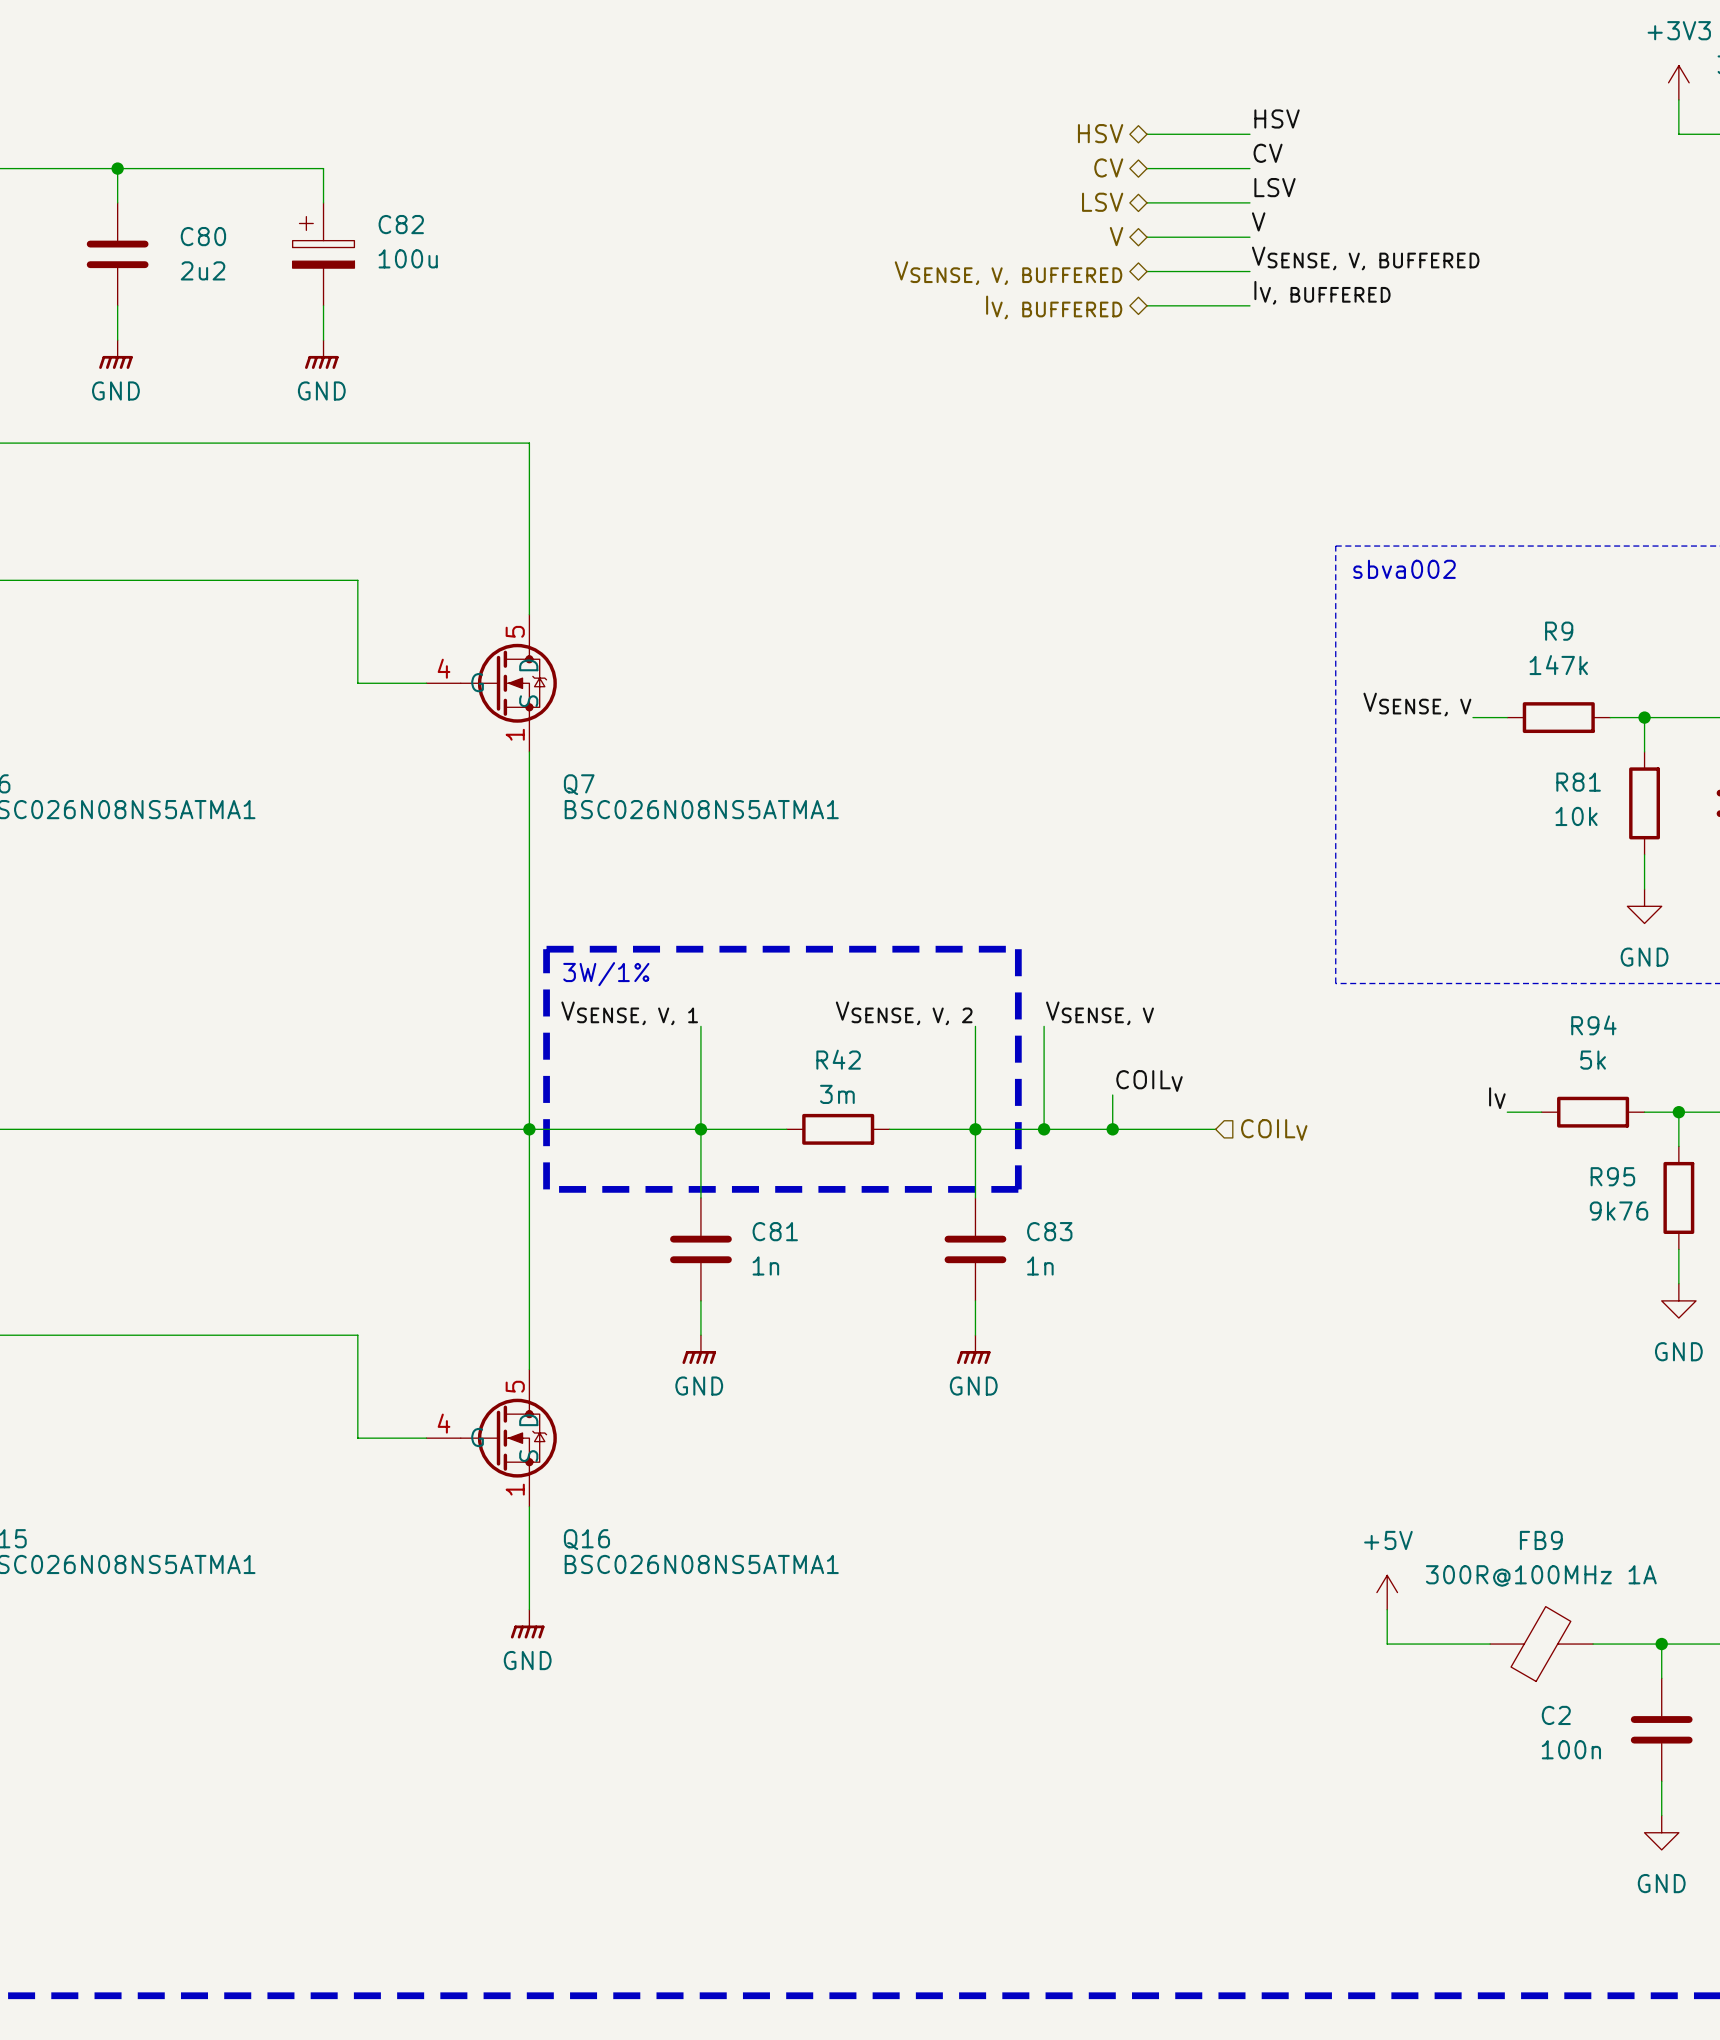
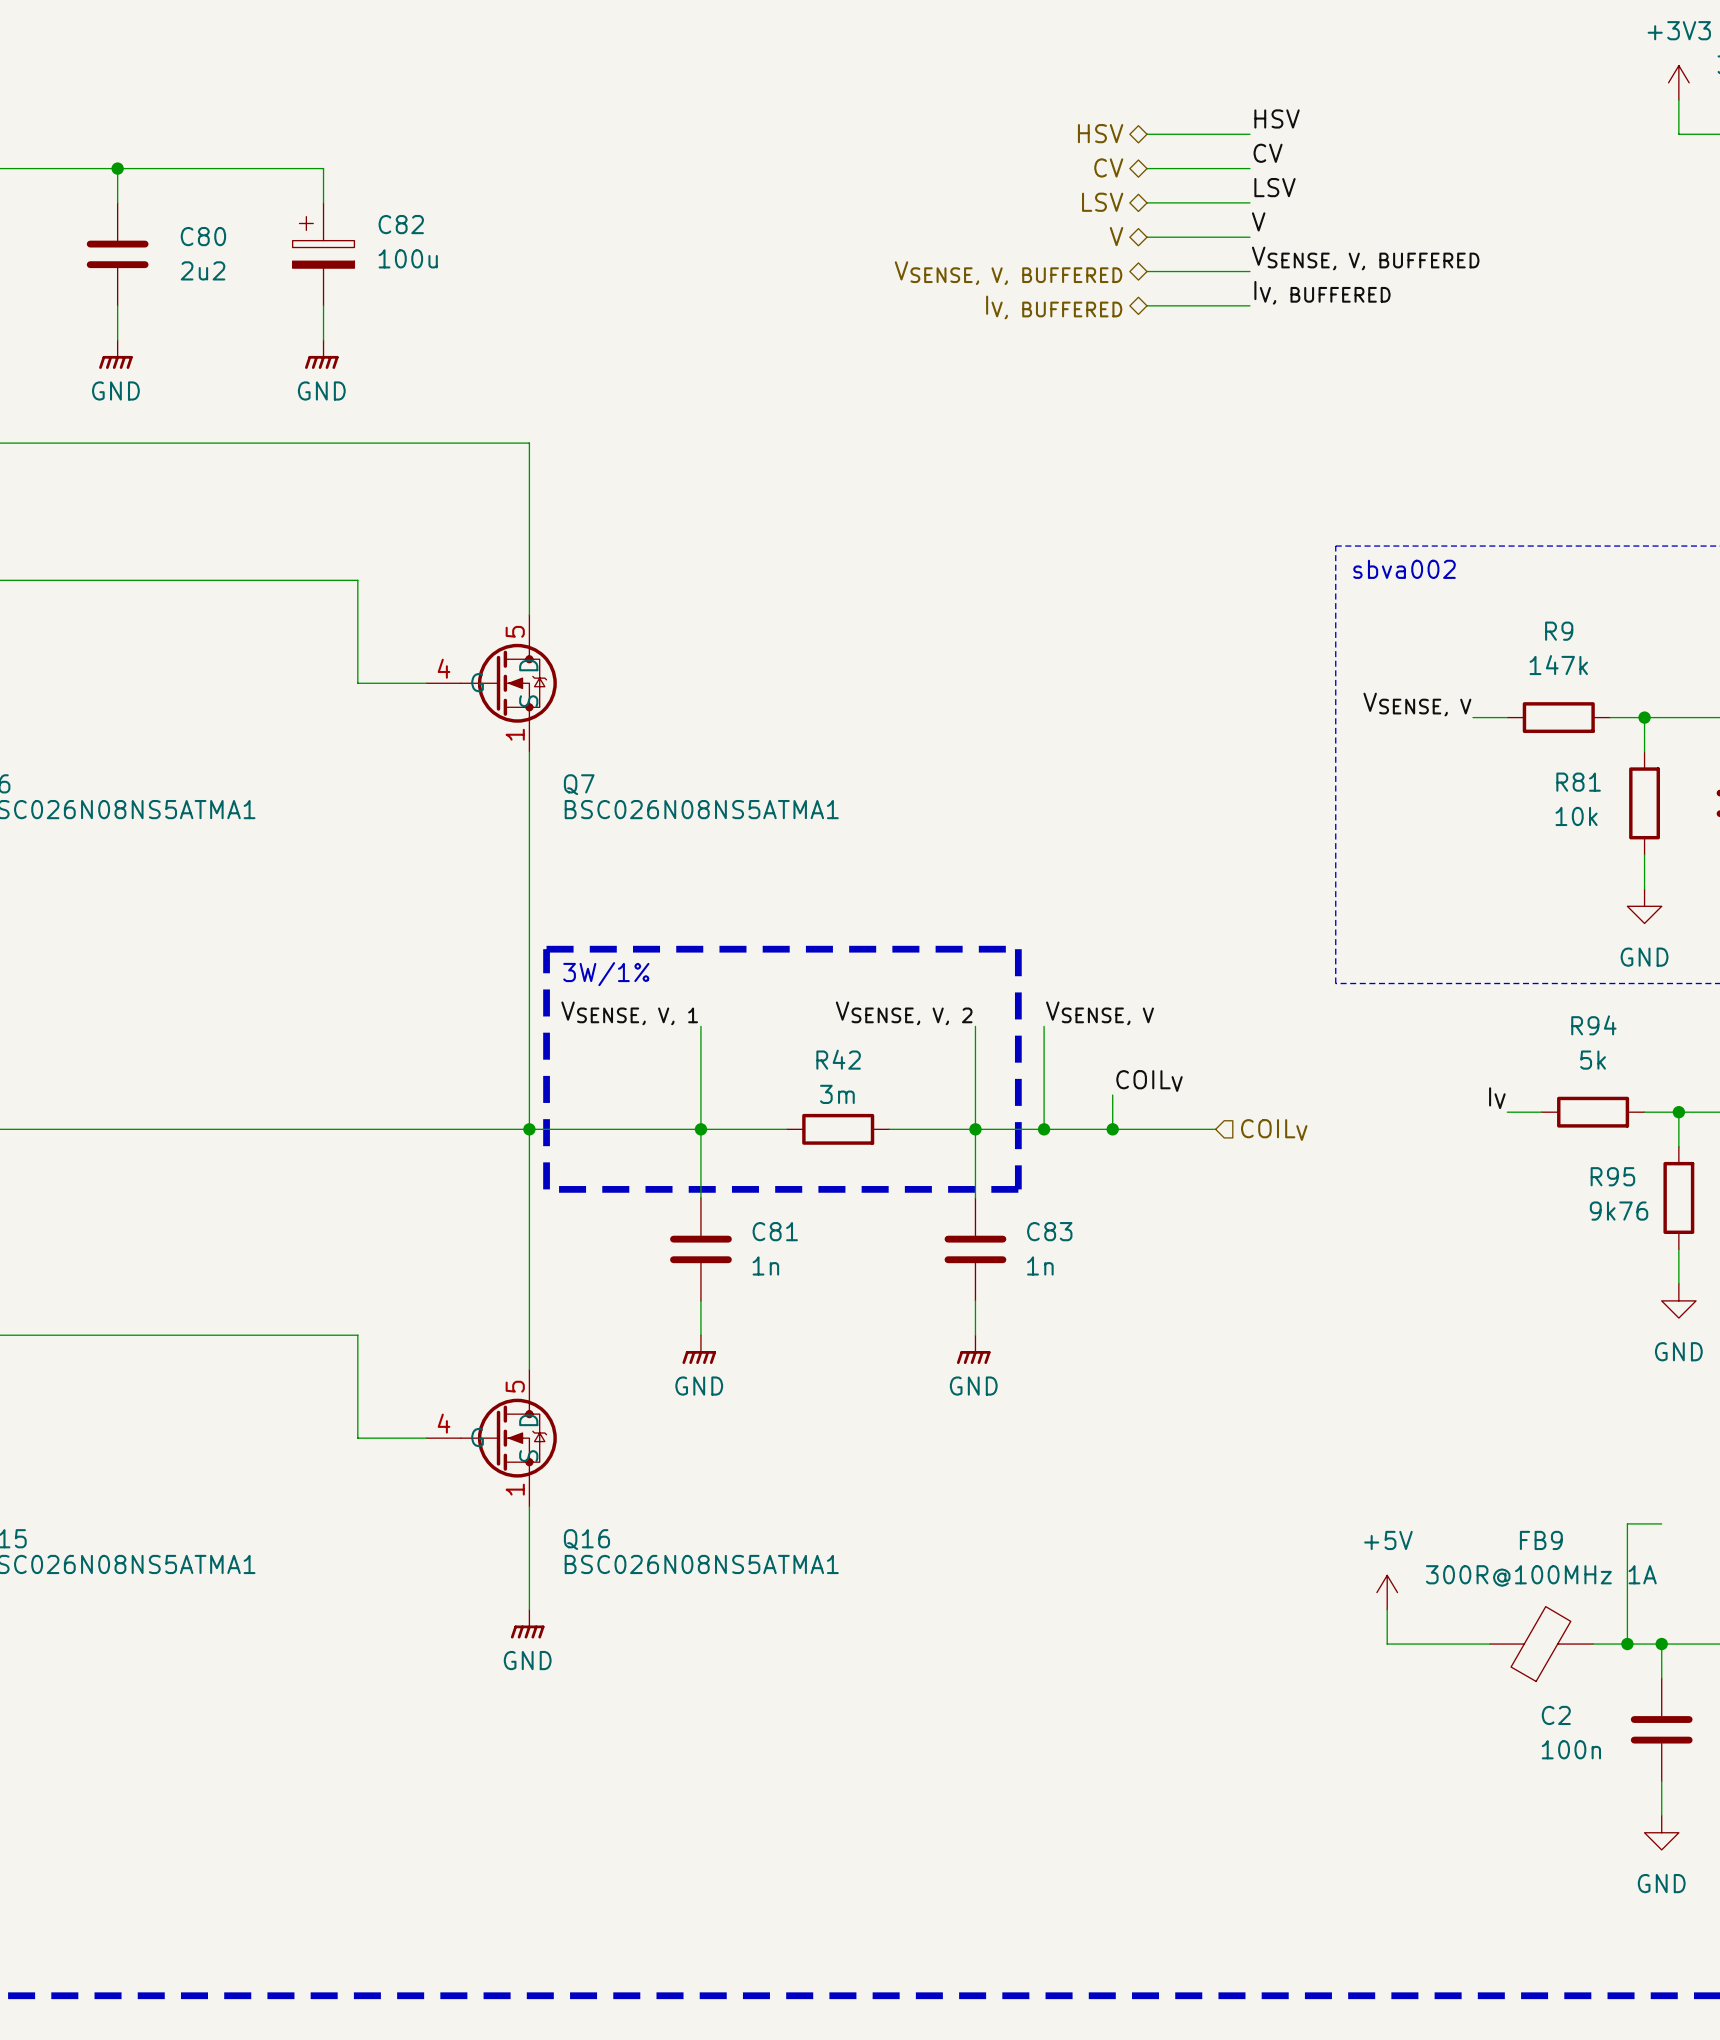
wire: none -> (1661, 1523) (1627, 1523) (1627, 1644)
junction: none -> (1627, 1644)

